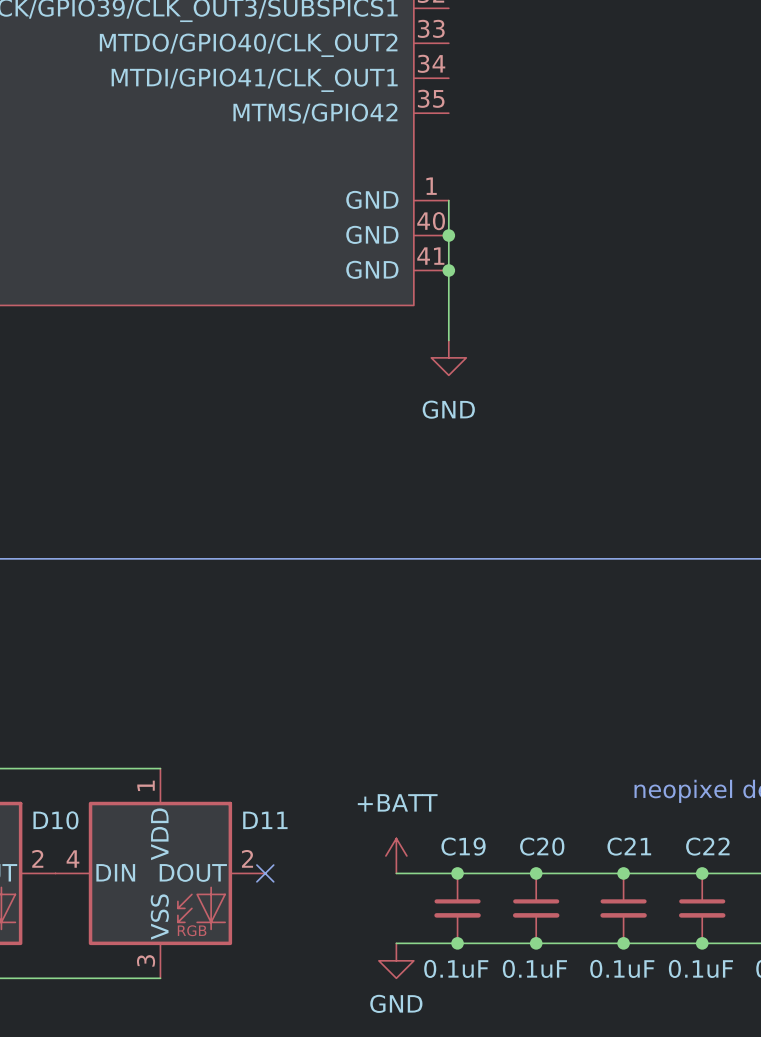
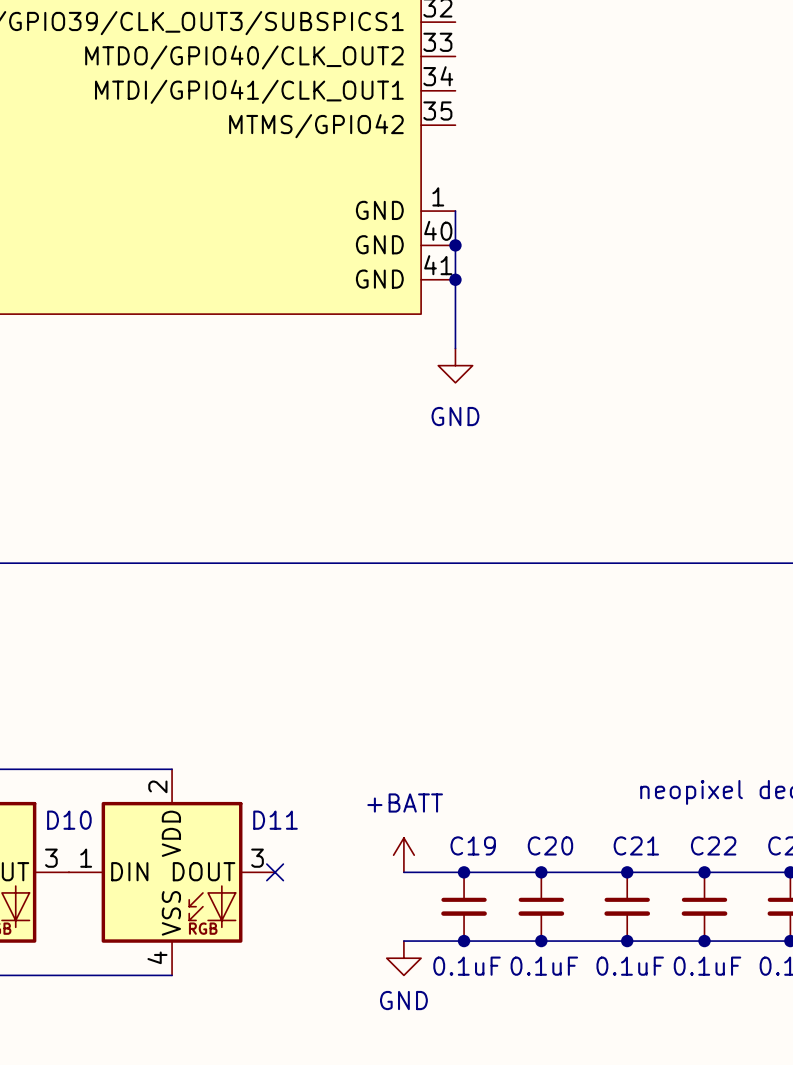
D11 pin number: 1 (146, 785) -> 2 (157, 786)
D10 pin number: 2 (37, 858) -> 3 (51, 858)
D11 pin number: 2 (247, 858) -> 3 (257, 858)
D11 pin number: 4 (72, 859) -> 1 (86, 858)
D11 pin number: 3 (146, 960) -> 4 (157, 957)

